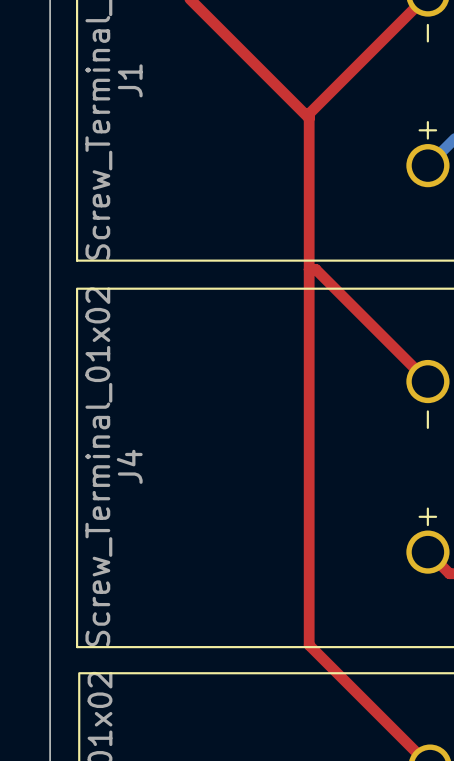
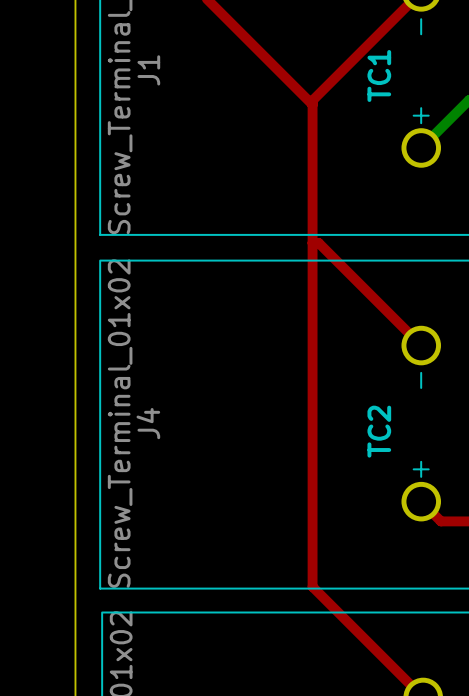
text: none -> TC1 (379, 76)
text: none -> TC2 (379, 431)

